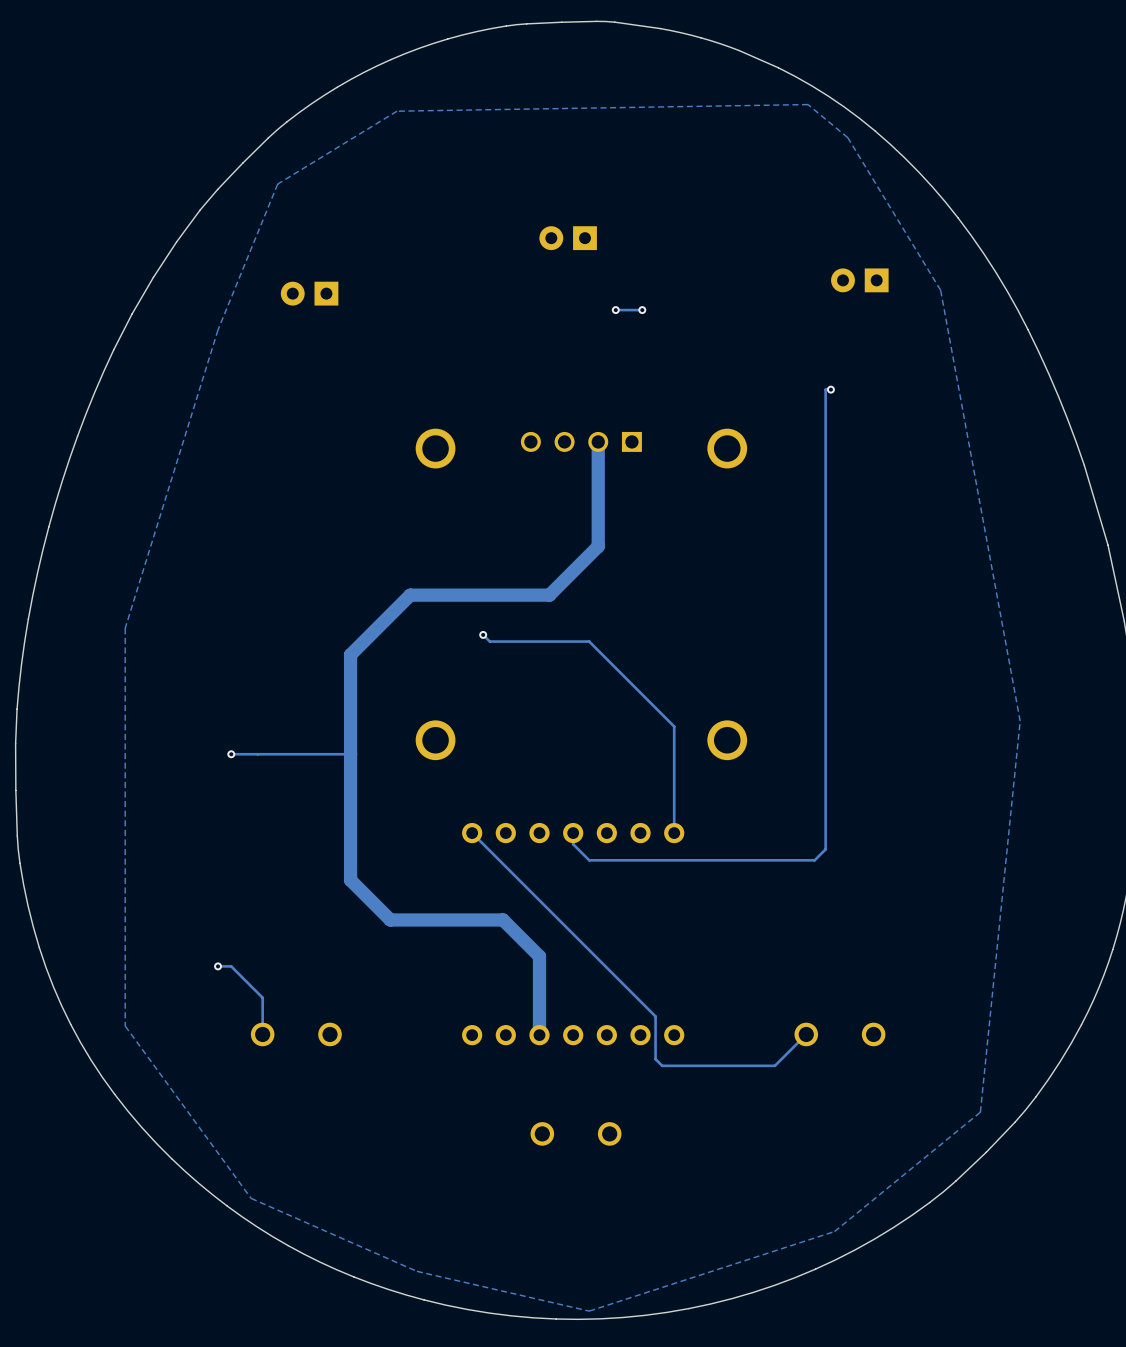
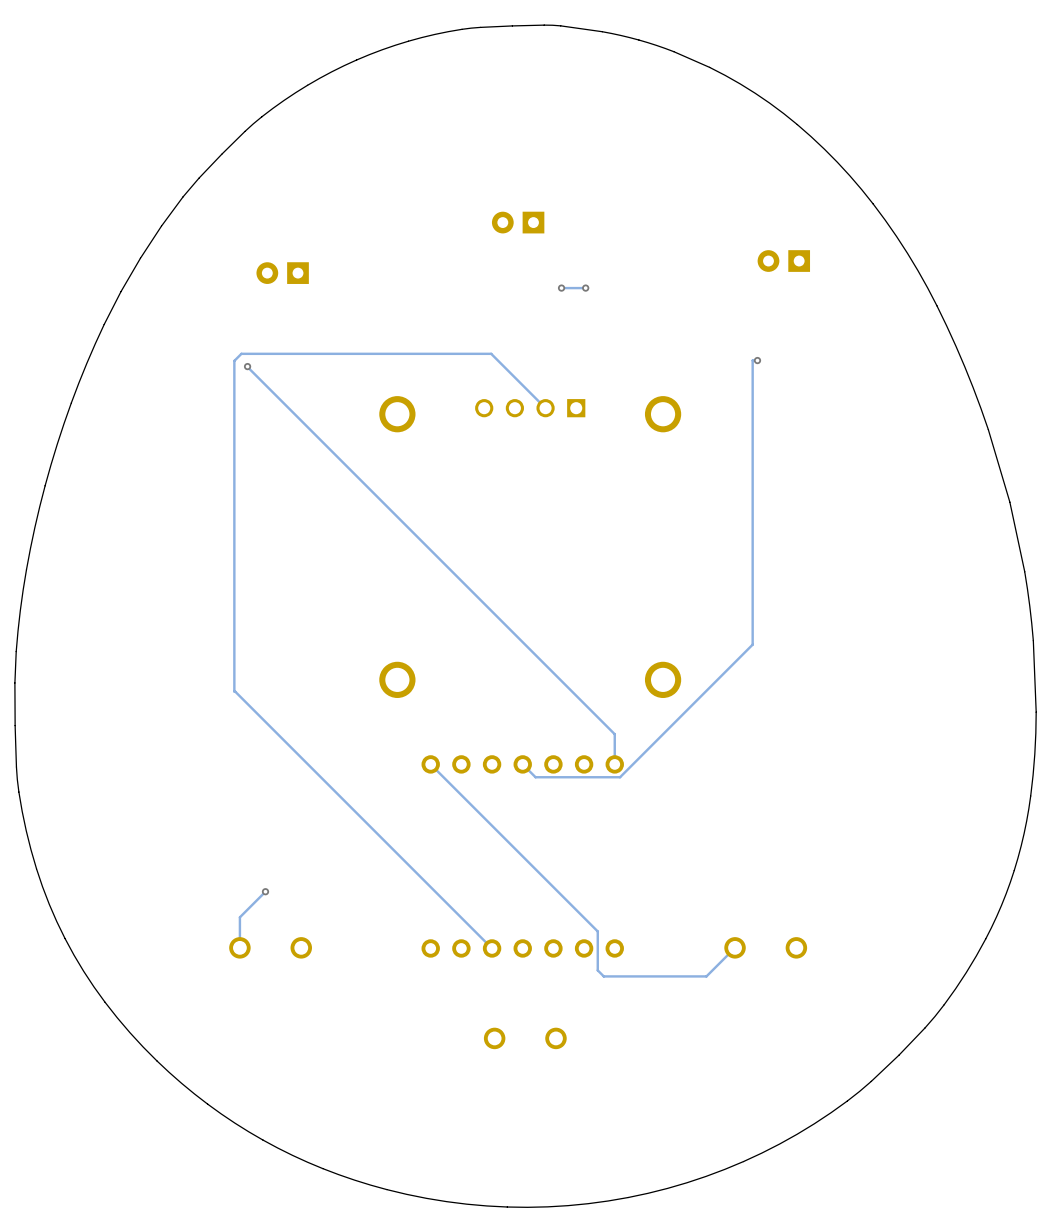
zone outline: (808, 104) (397, 111) (277, 184) (218, 329) (125, 628) (125, 1026) (251, 1198) (416, 1271) (589, 1311) (834, 1231) (980, 1112) (1020, 721) (940, 290) (847, 137) (808, 104) -> none
via: none -> (247, 366)
track: (598, 441) (598, 546) (549, 595) (410, 595) (350, 654) (350, 880) (390, 919) (503, 919) (539, 956) (539, 1035) -> (545, 408) (491, 353) (241, 353) (234, 360) (234, 691) (492, 948)
track: (483, 634) (489, 641) (589, 641) (674, 726) (674, 799) -> (247, 366) (614, 734)
via: (483, 634) -> none
track: (825, 701) (825, 849) (814, 860) (589, 860) (573, 844) (573, 833) -> (752, 644) (620, 777) (535, 777) (522, 764)
via: (231, 754) -> none
track: (350, 754) (231, 754) -> none
track: (218, 966) (231, 966) (262, 997) (262, 1000) -> (265, 891) (239, 917)
via position: (218, 966) -> (265, 891)

